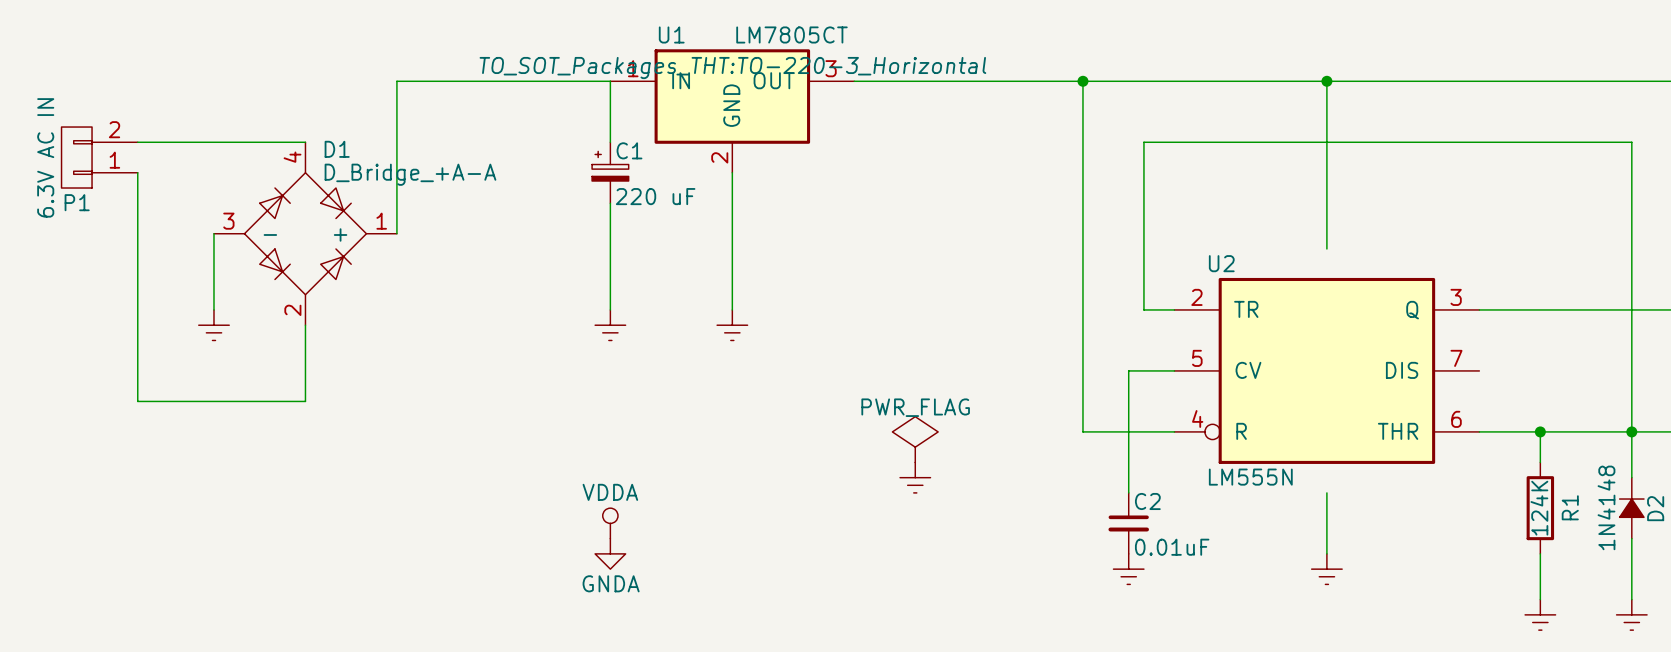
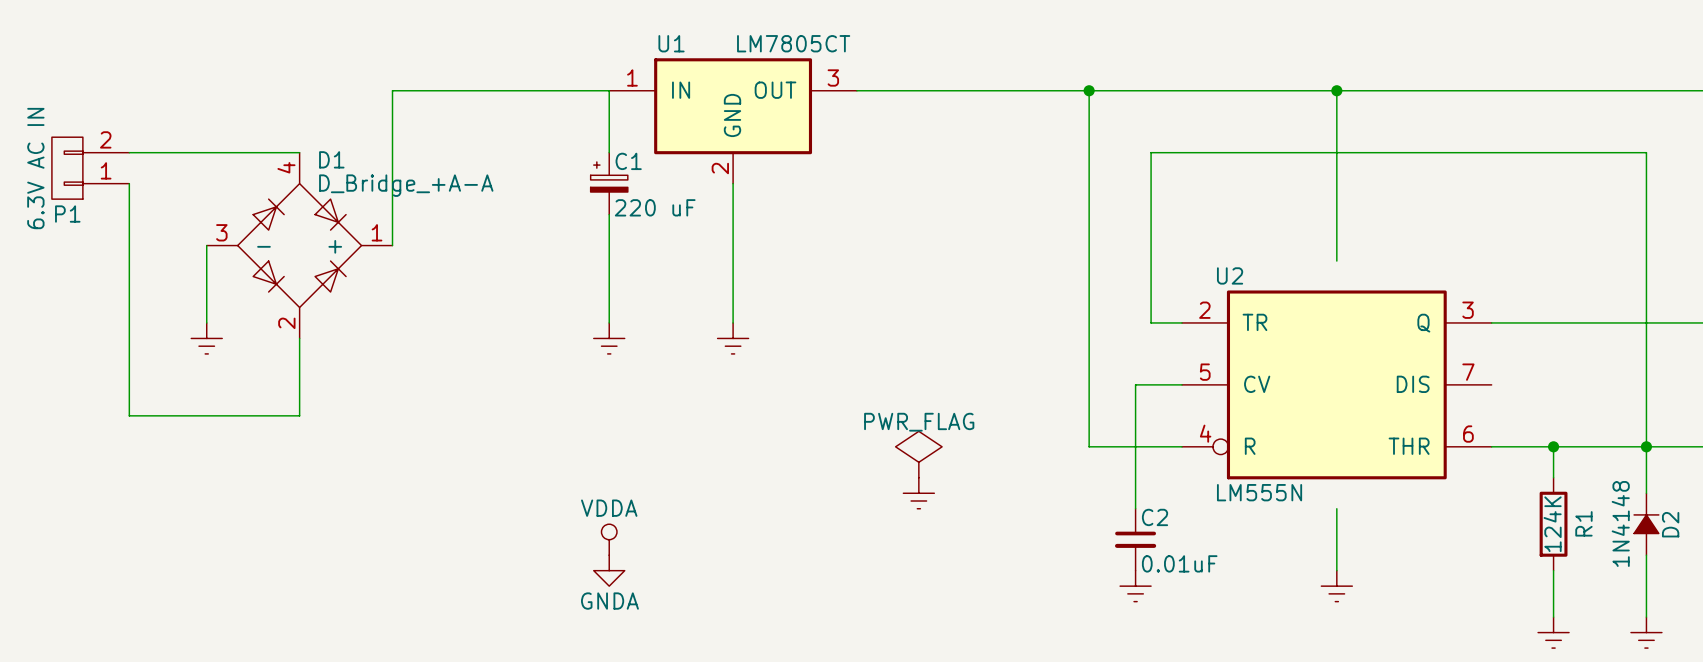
U1 text: TO_SOT_Packages_THT:TO-220-3_Horizontal (732, 68) -> none

